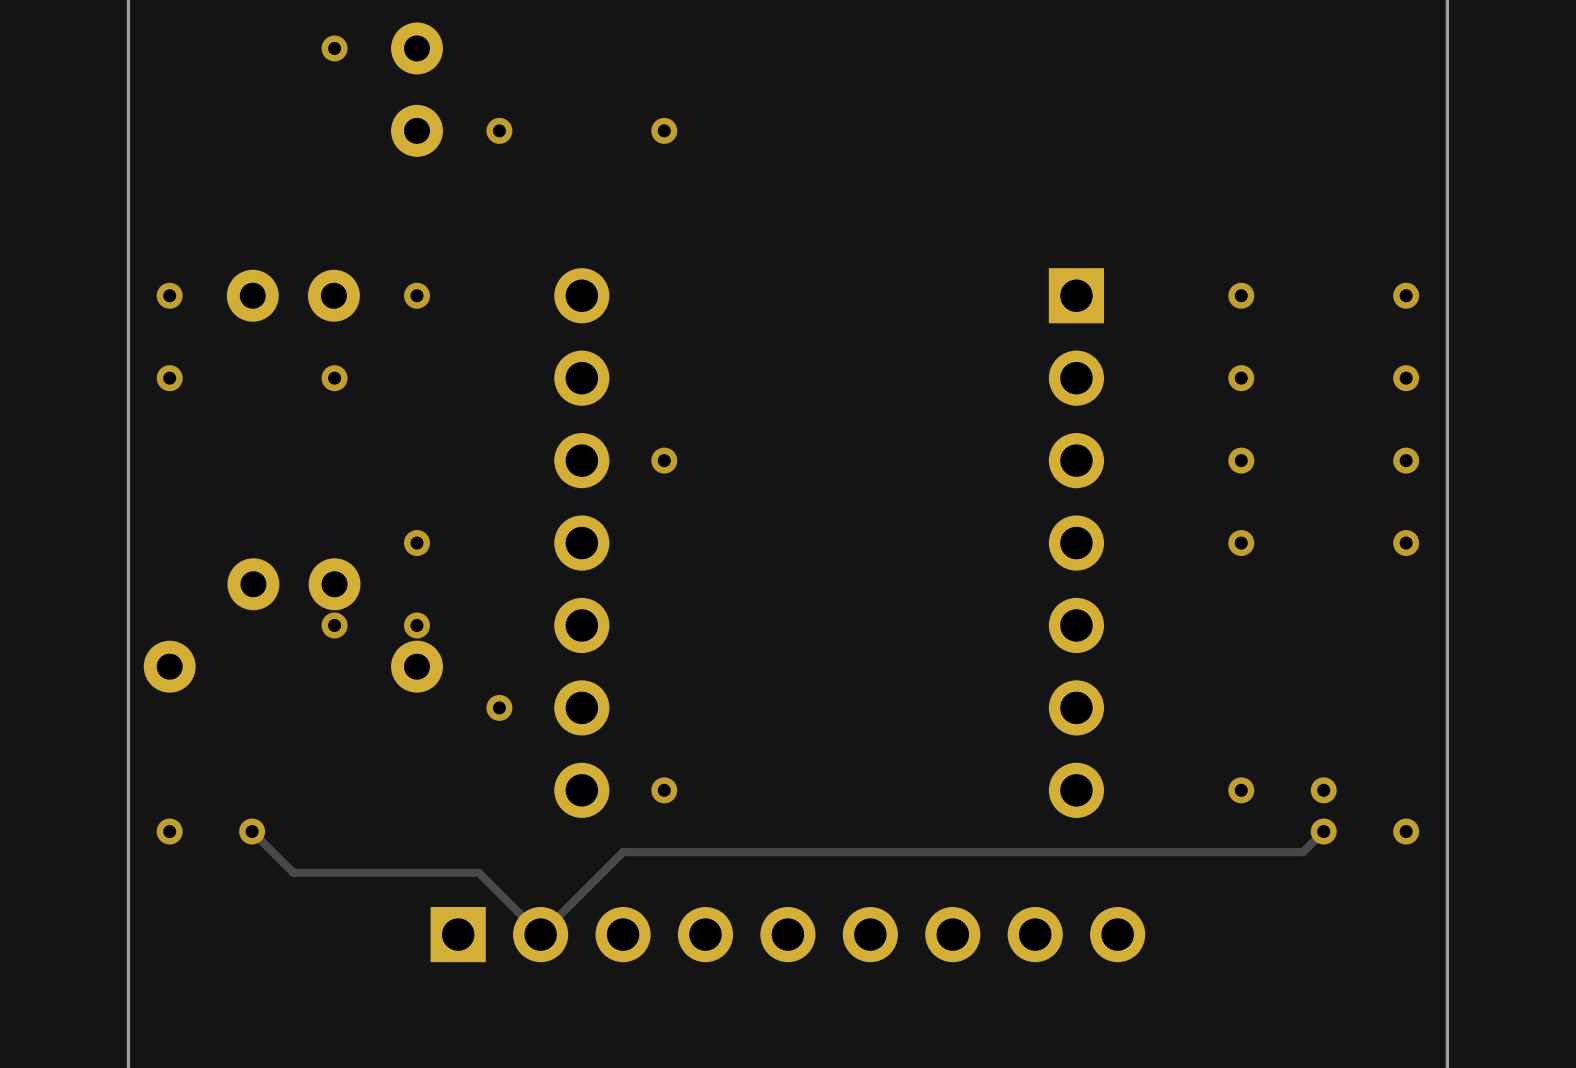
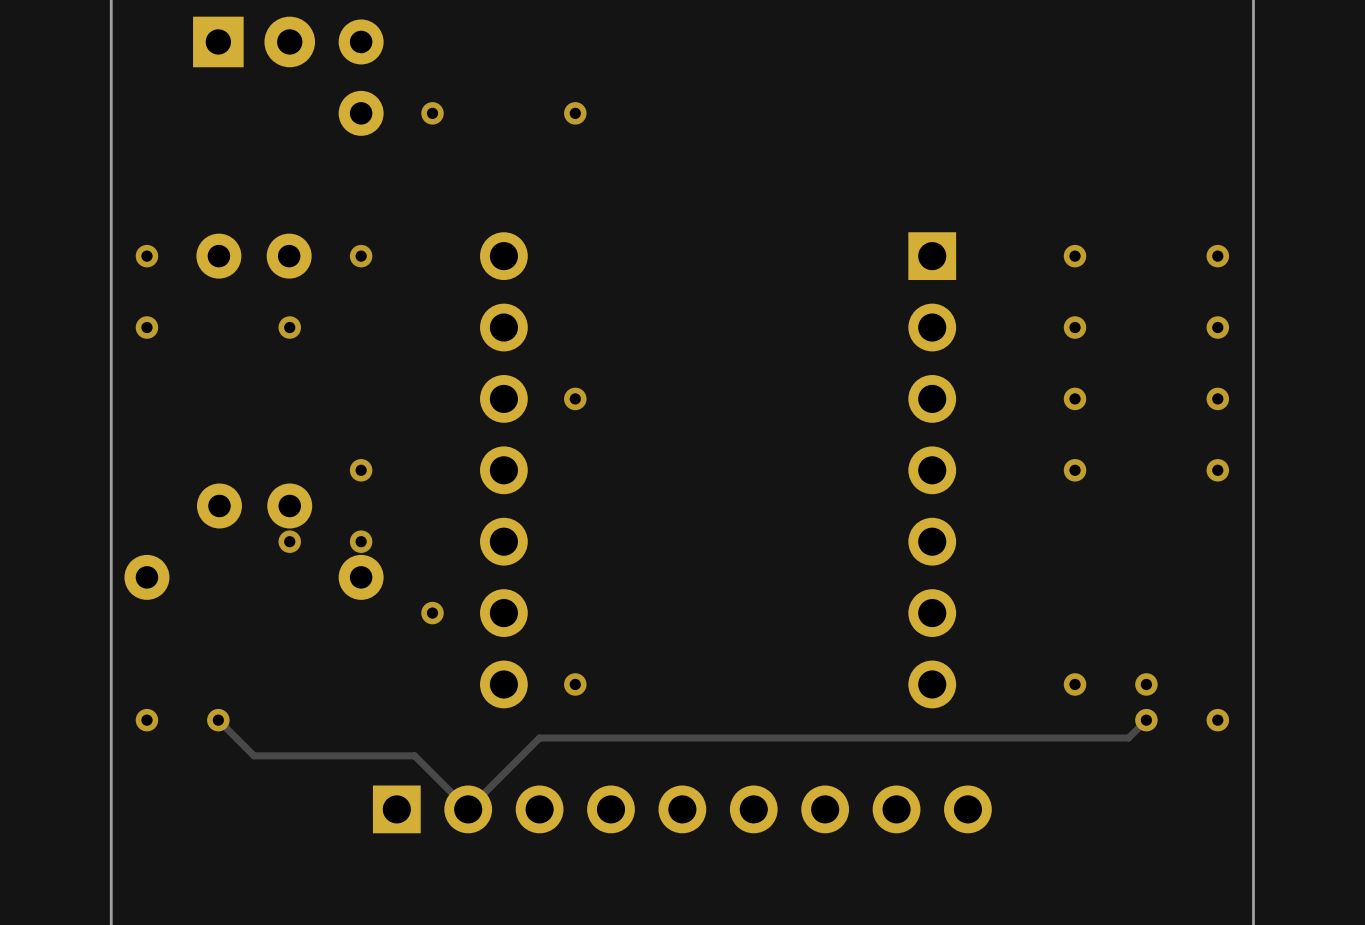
part: none -> (254, 41)
via: (334, 48) -> none

